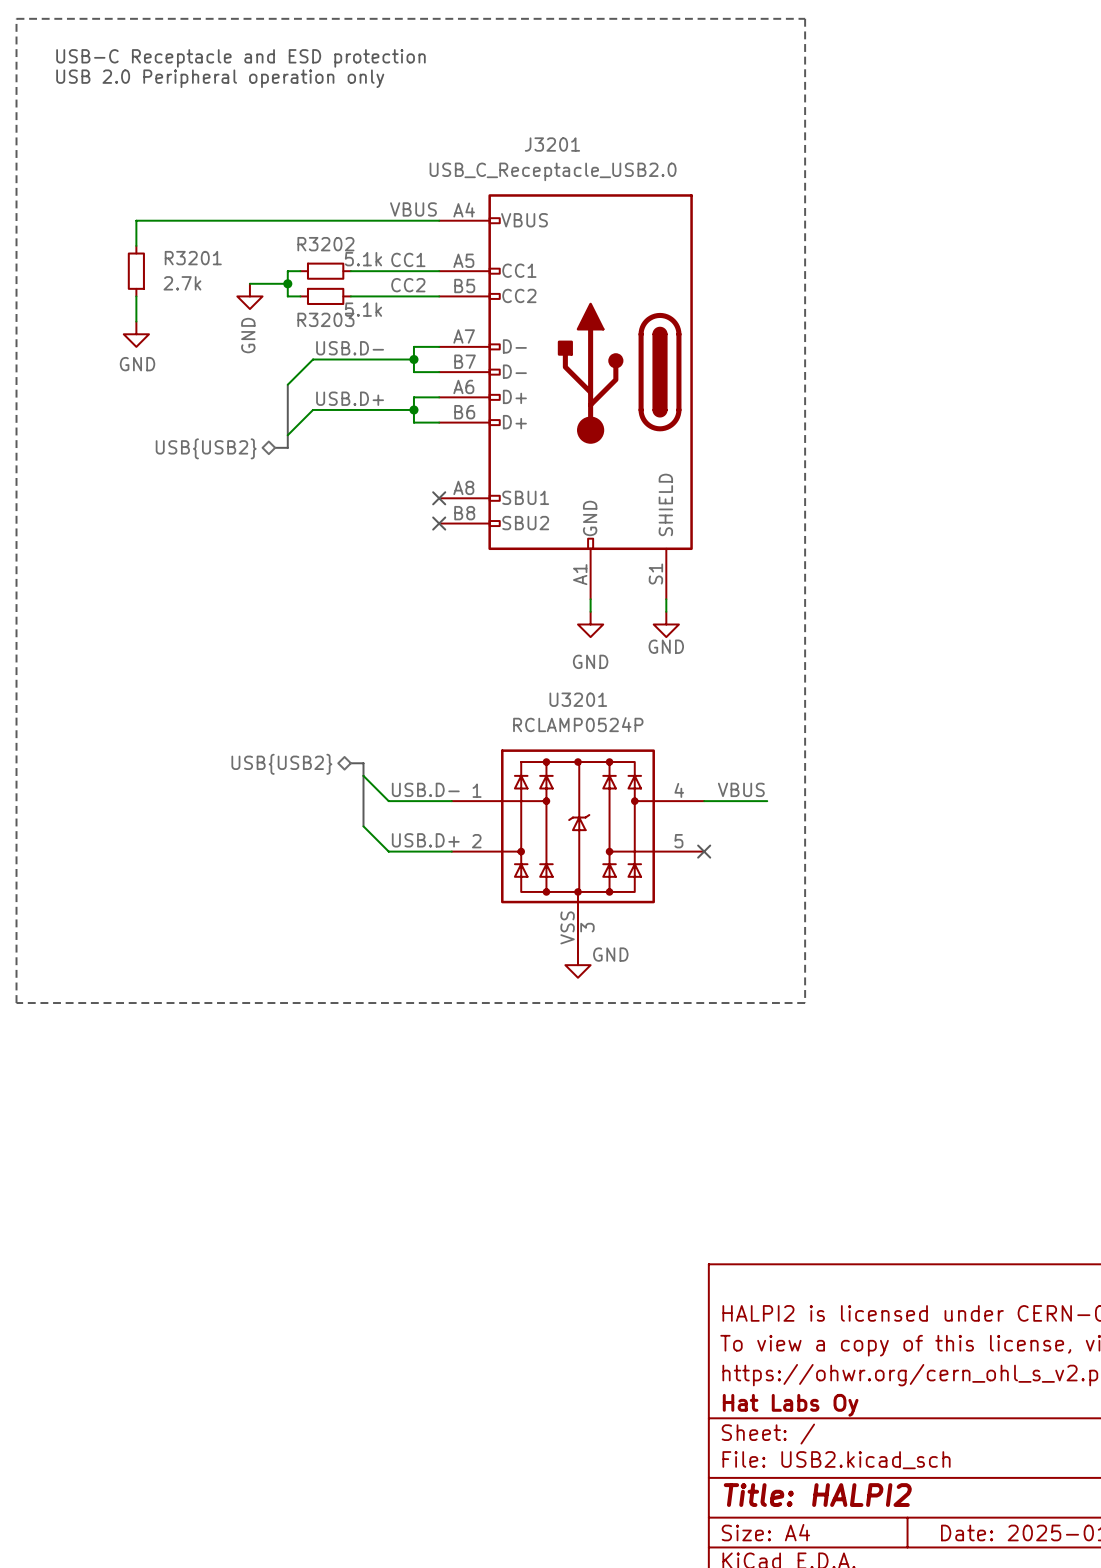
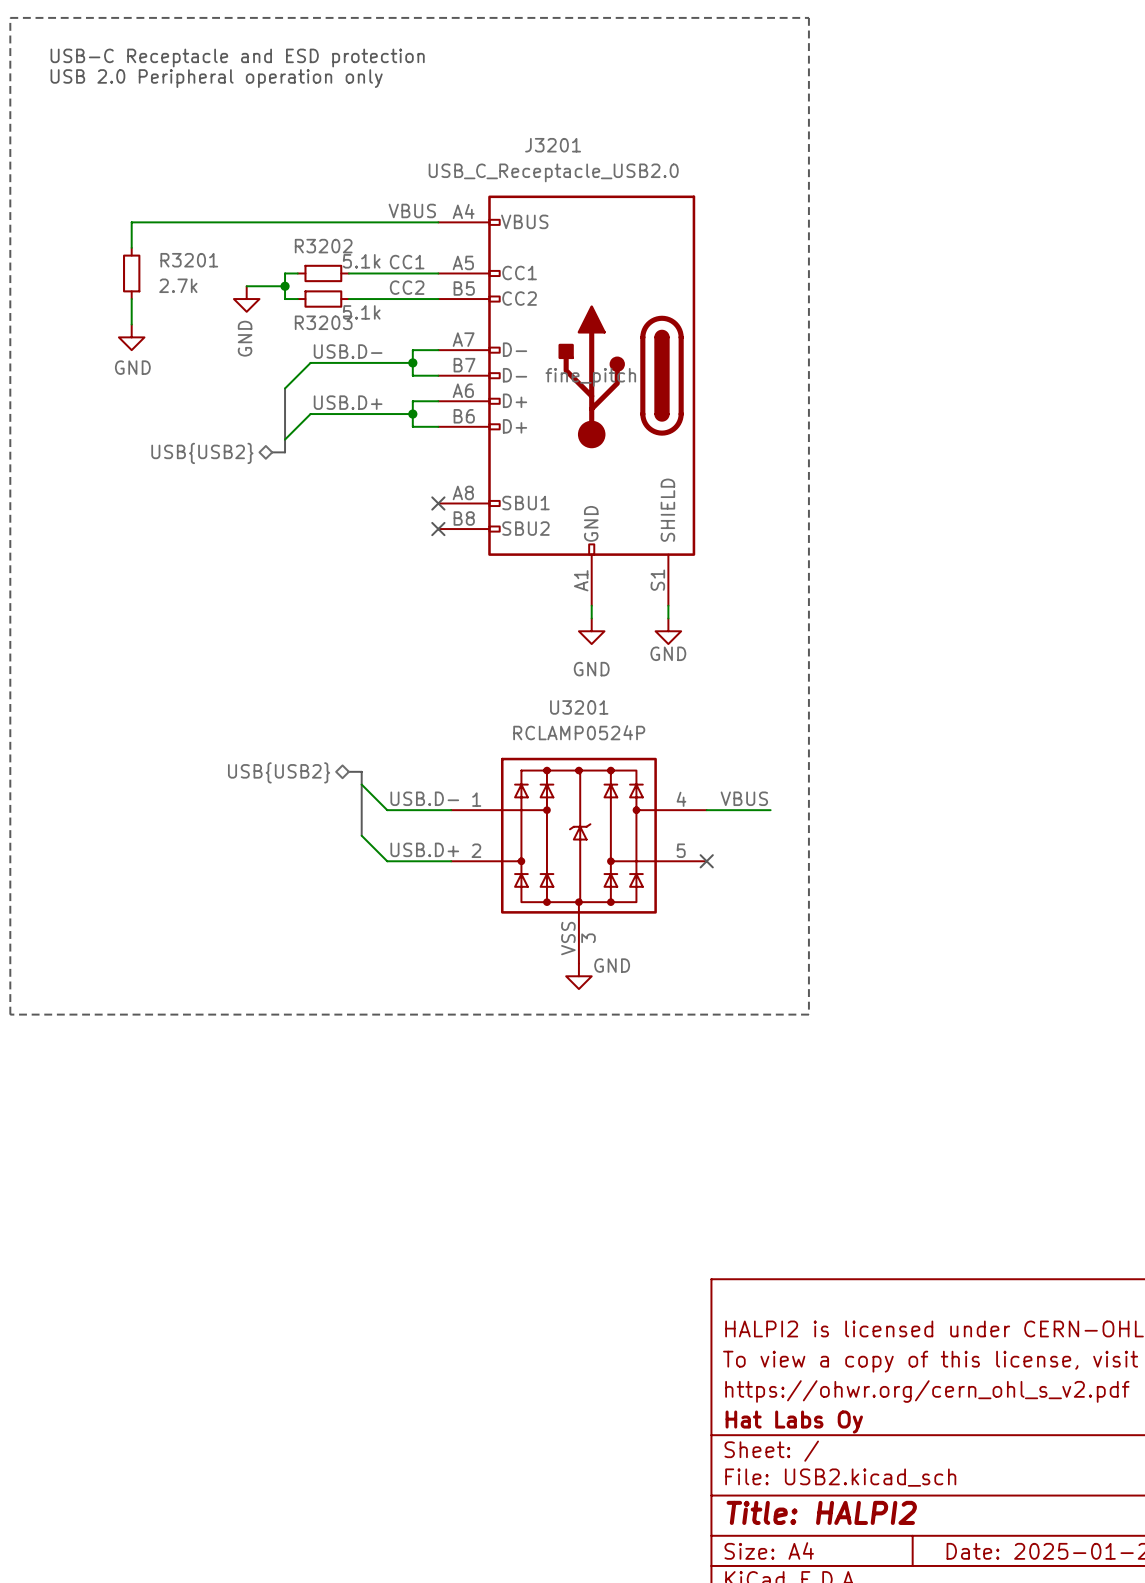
J3201 text: none -> fine_pitch (590, 377)

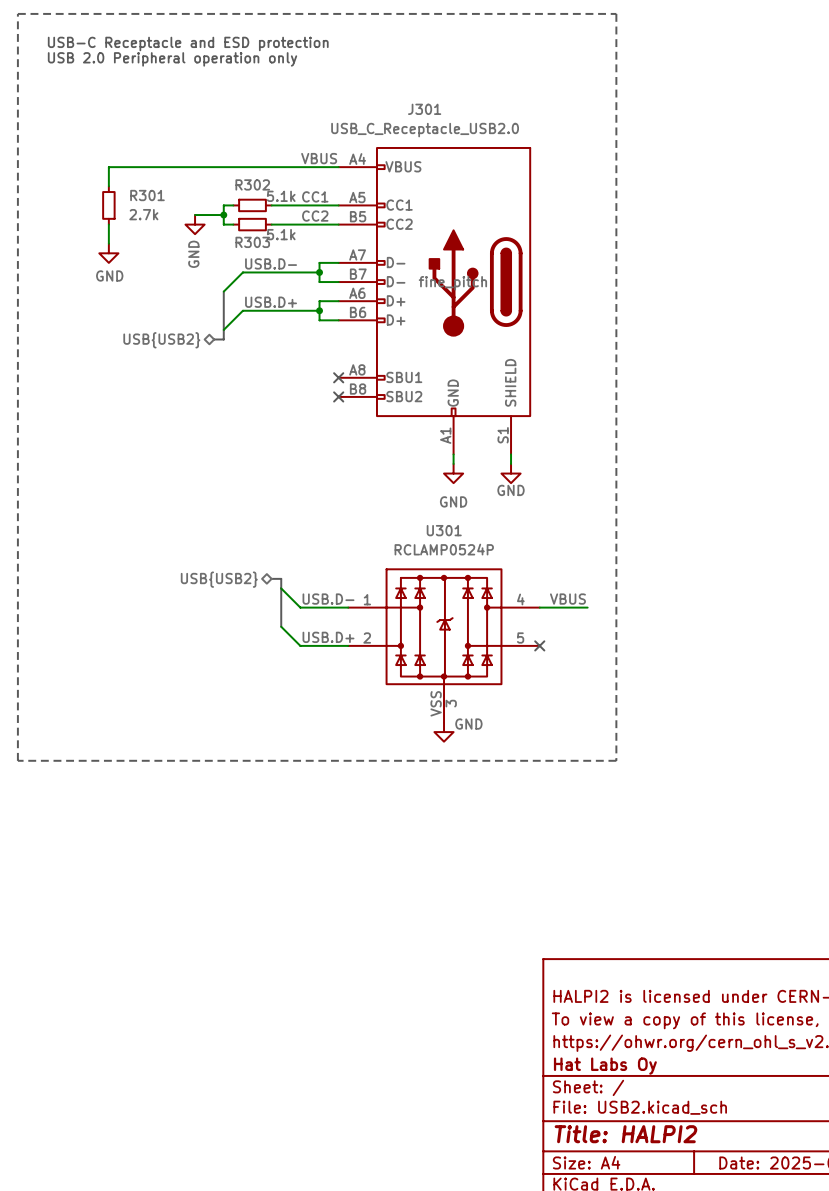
J3201 name: J3201 (553, 145) -> J301 (424, 109)
R3202 name: R3202 (323, 246) -> R302 (252, 184)
R3201 name: R3201 (189, 260) -> R301 (147, 195)
R3203 name: R3203 (323, 322) -> R303 (252, 242)
U3201 name: U3201 (579, 707) -> U301 (444, 530)

